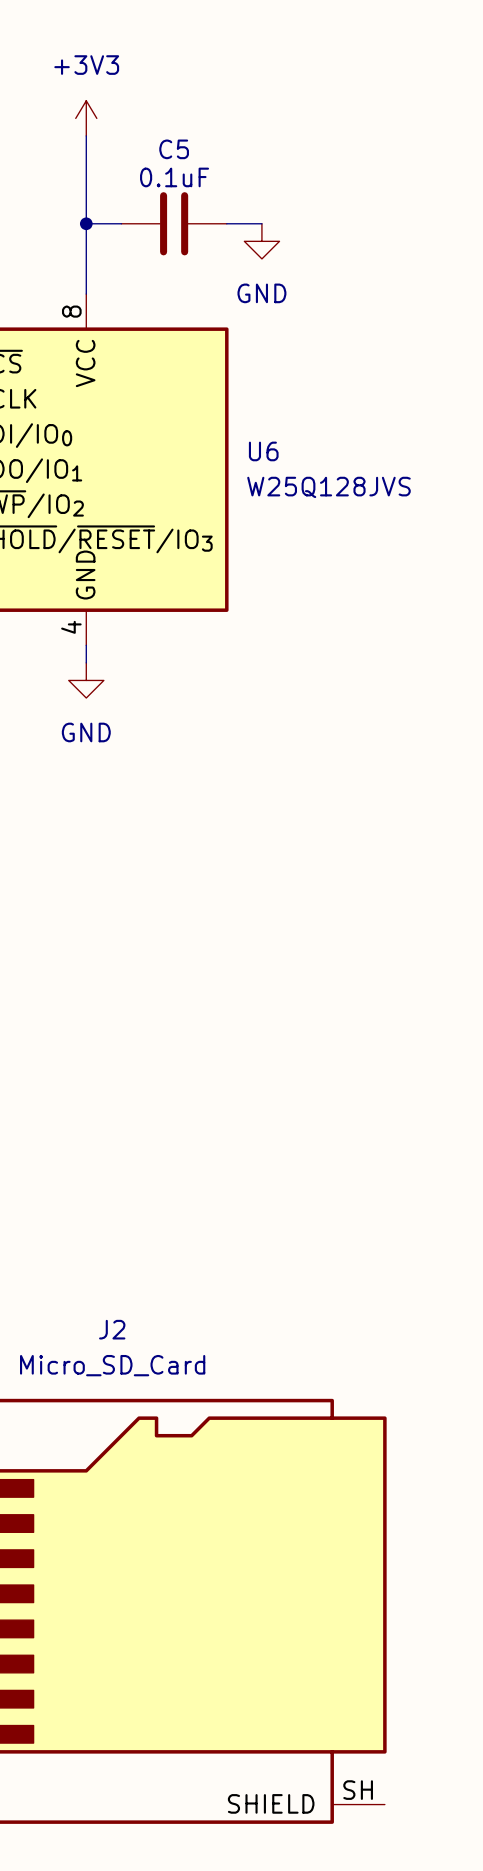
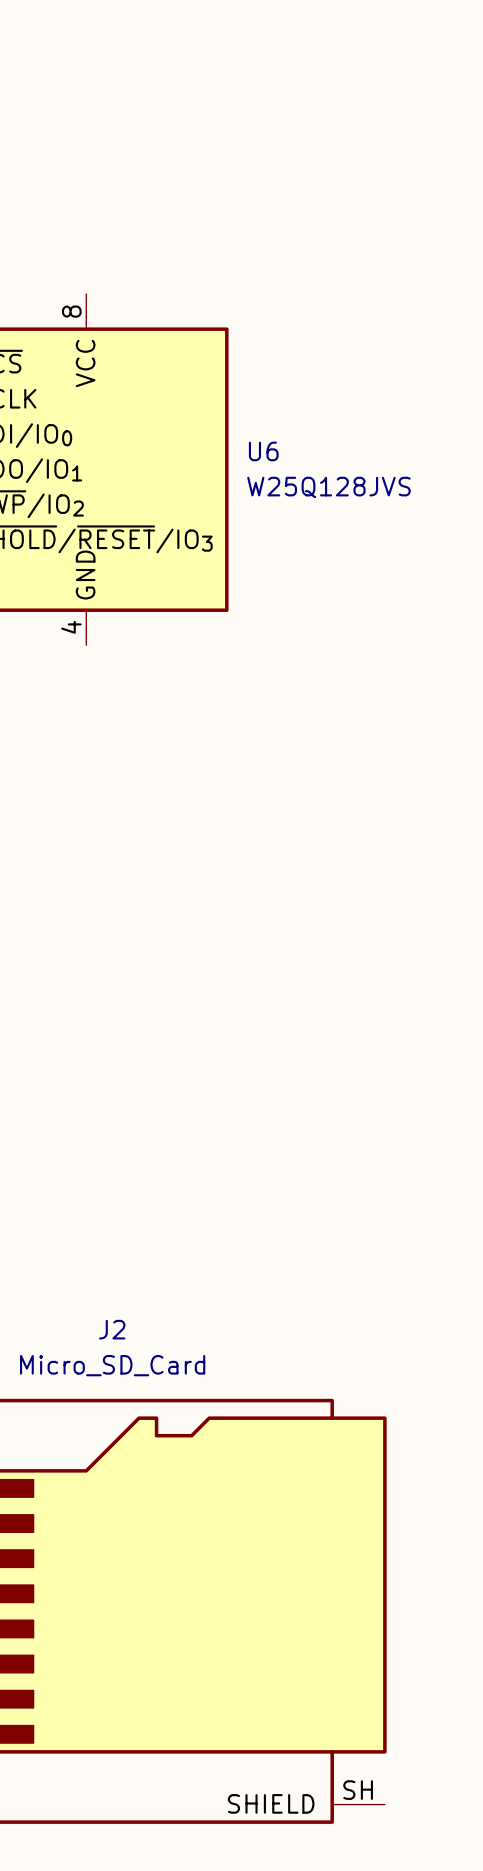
power symbol: +3V3 (86, 118) -> none
wire: (86, 135) (86, 294) -> none
wire: (86, 223) (121, 223) -> none
junction: (86, 223) -> none
C5: 0.1uF (174, 223) -> none
wire: (226, 223) (261, 223) -> none
power symbol: GND (261, 241) -> none
wire: (86, 645) (86, 662) -> none
power symbol: GND (86, 680) -> none

